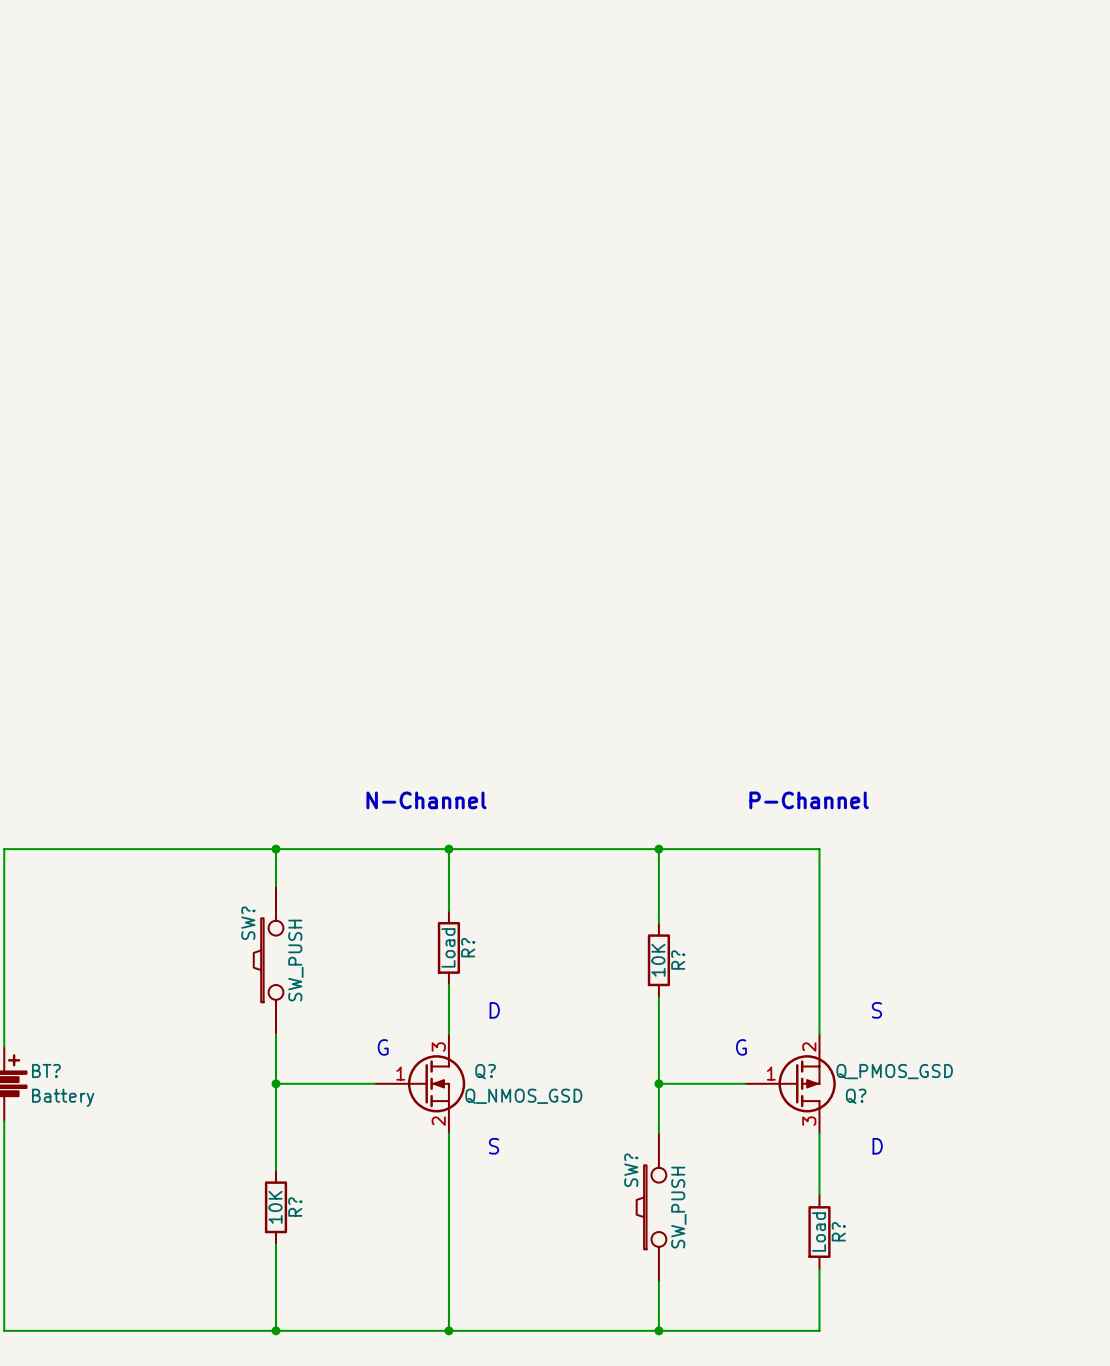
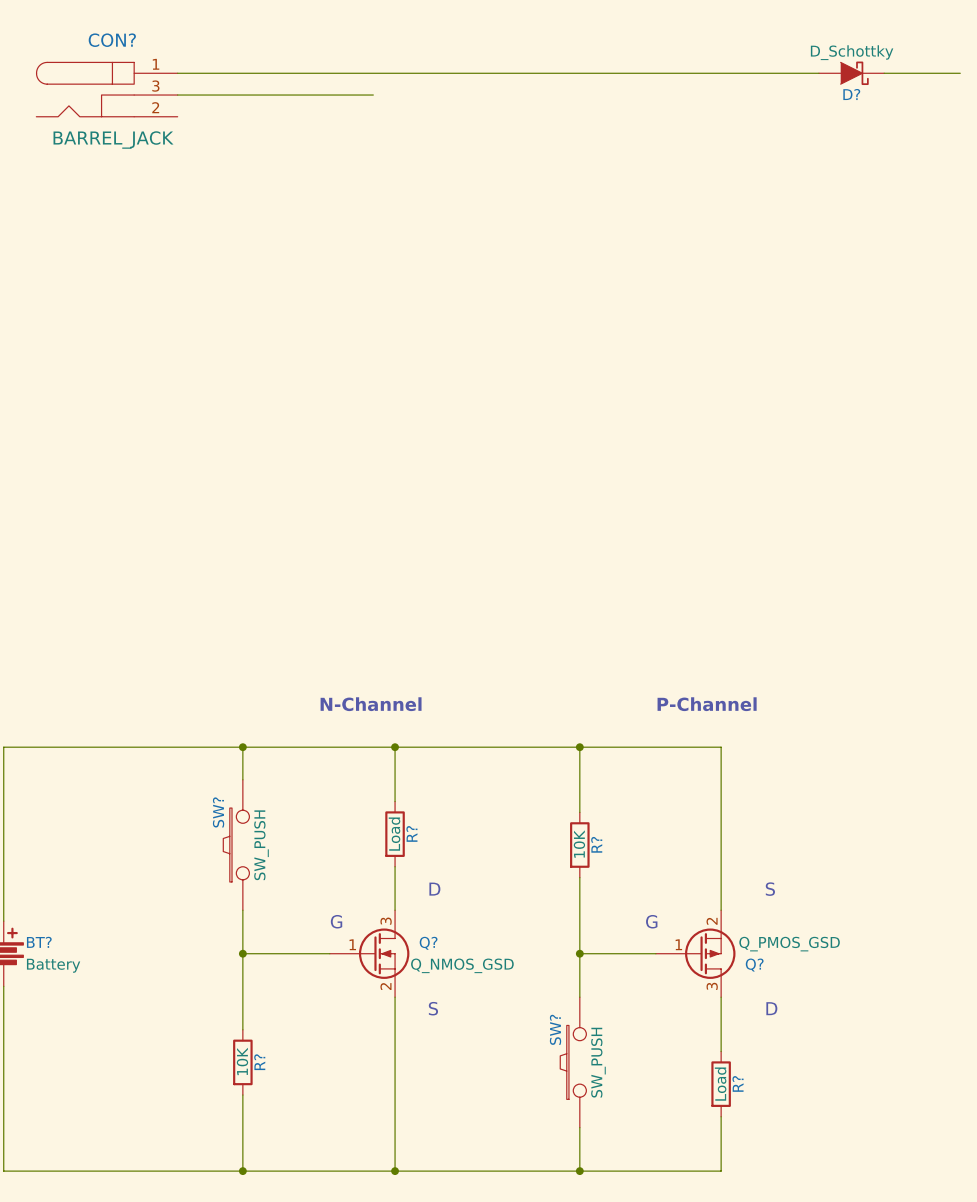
wire: none -> (177, 73) (818, 73)
D?: none -> D_Schottky (851, 73)
wire: none -> (884, 73) (960, 73)
CON?: none -> BARREL_JACK (107, 89)
wire: none -> (177, 95) (373, 95)

